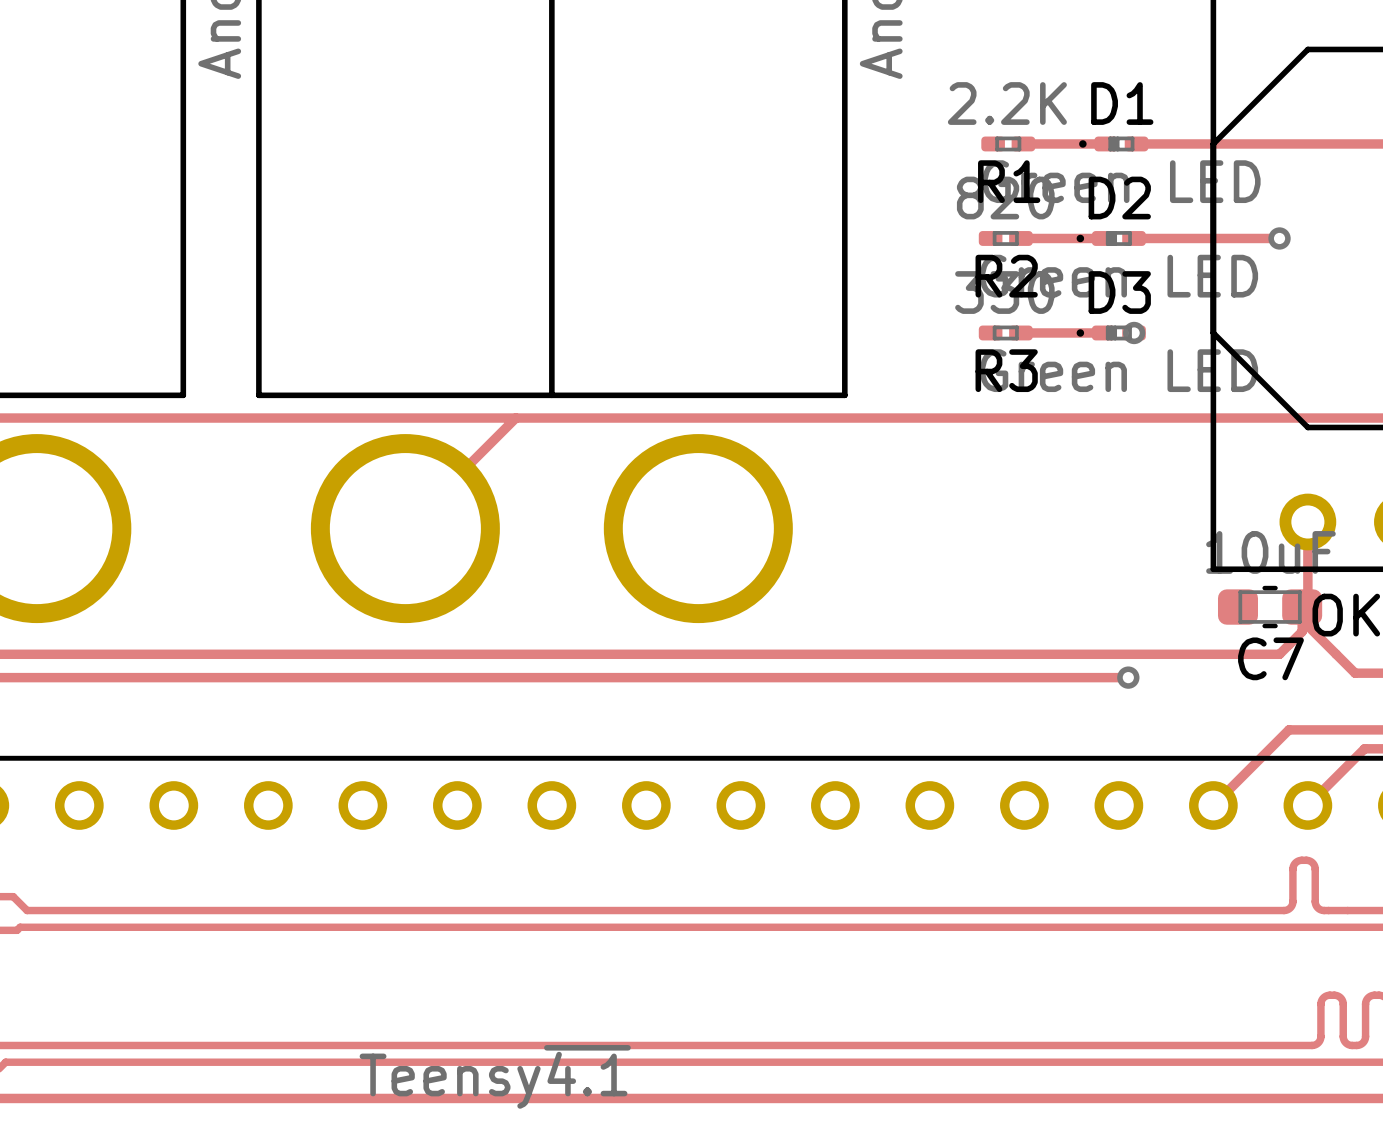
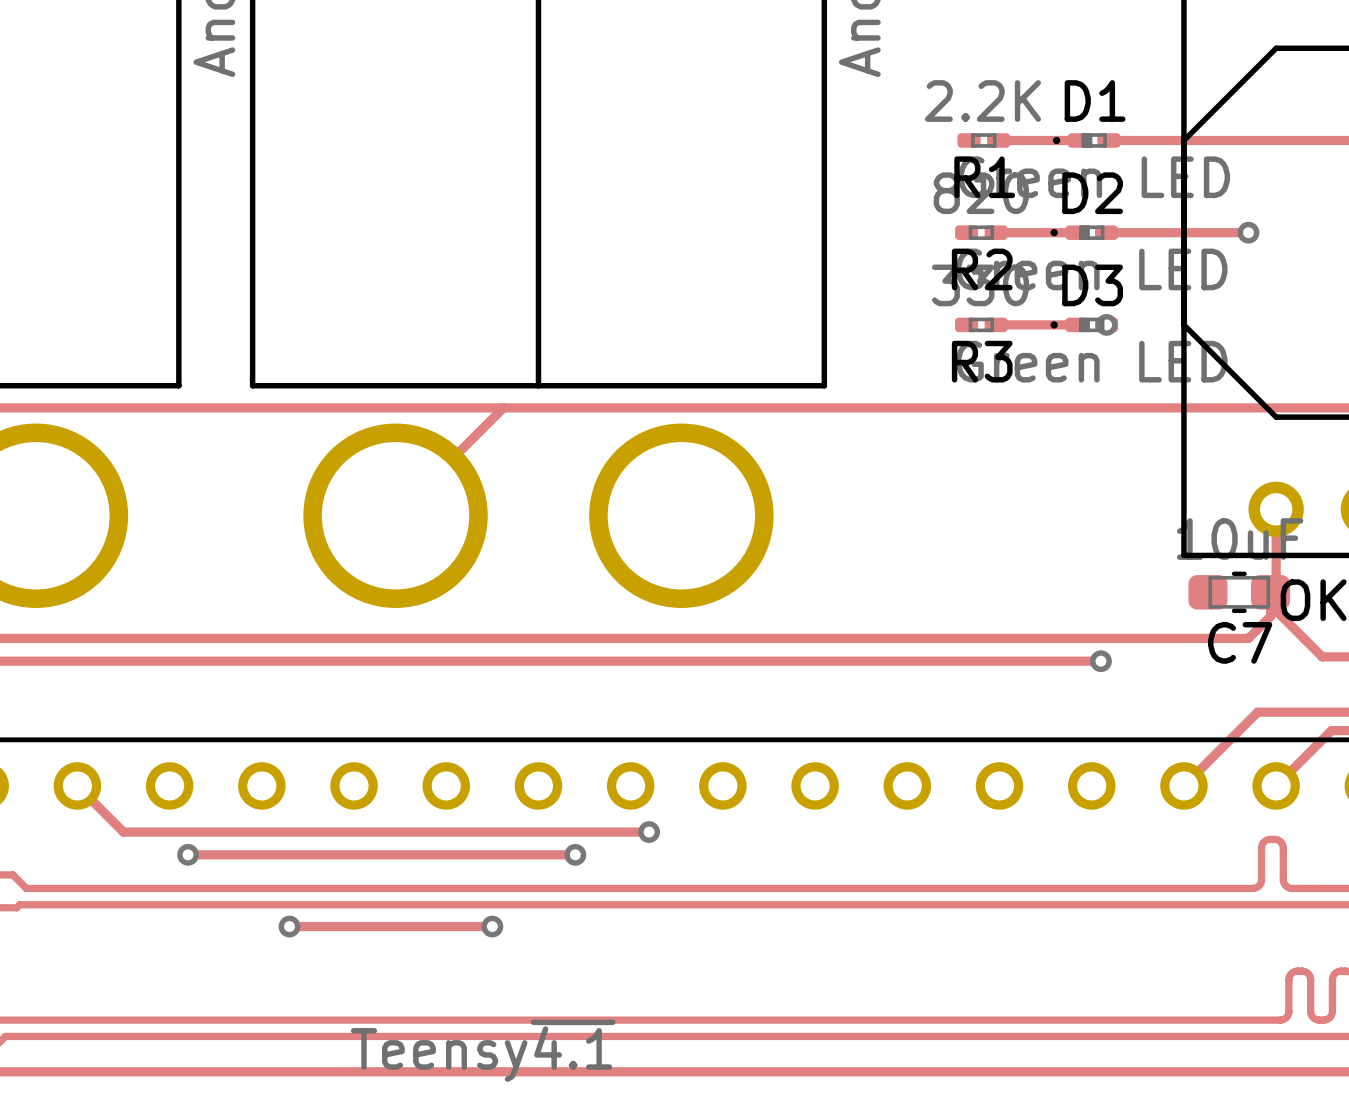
track: none -> (77, 785) (123, 832) (649, 832)
via: none -> (649, 832)
track: none -> (188, 854) (575, 854)
via: none -> (188, 854)
via: none -> (575, 854)
track: none -> (289, 926) (492, 926)
via: none -> (289, 926)
via: none -> (492, 926)

